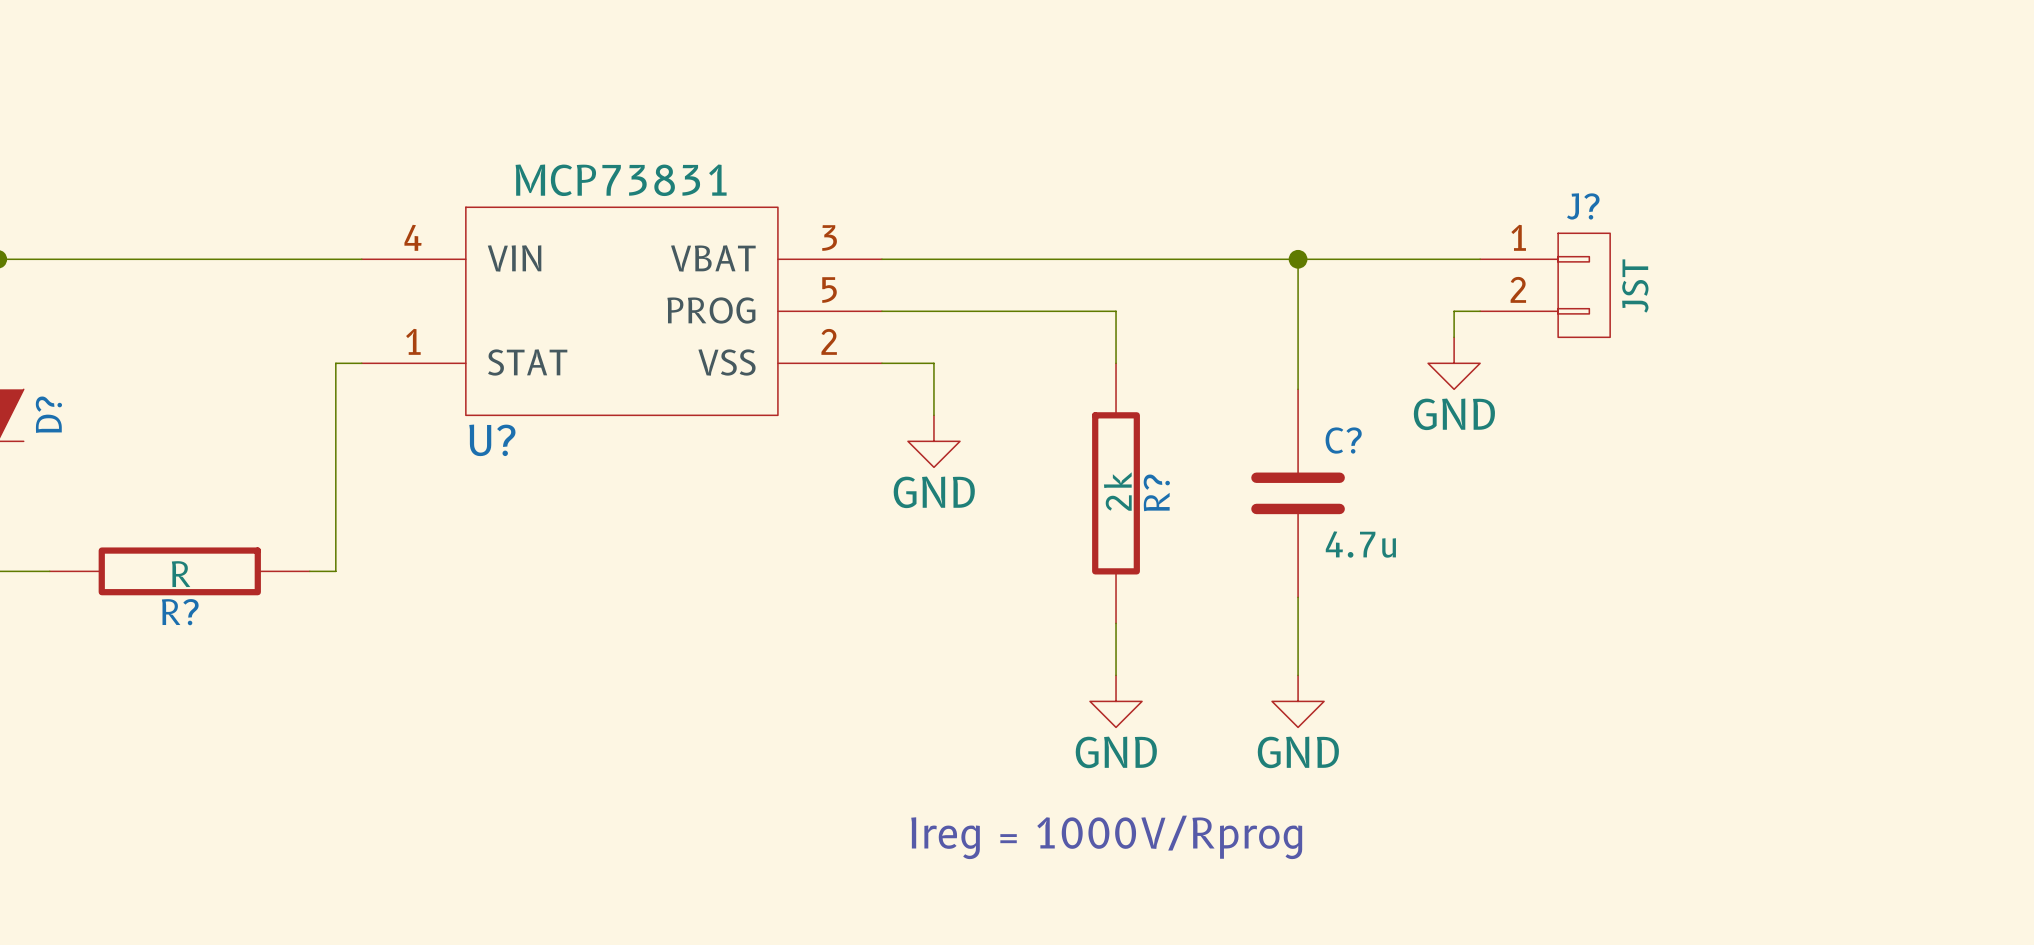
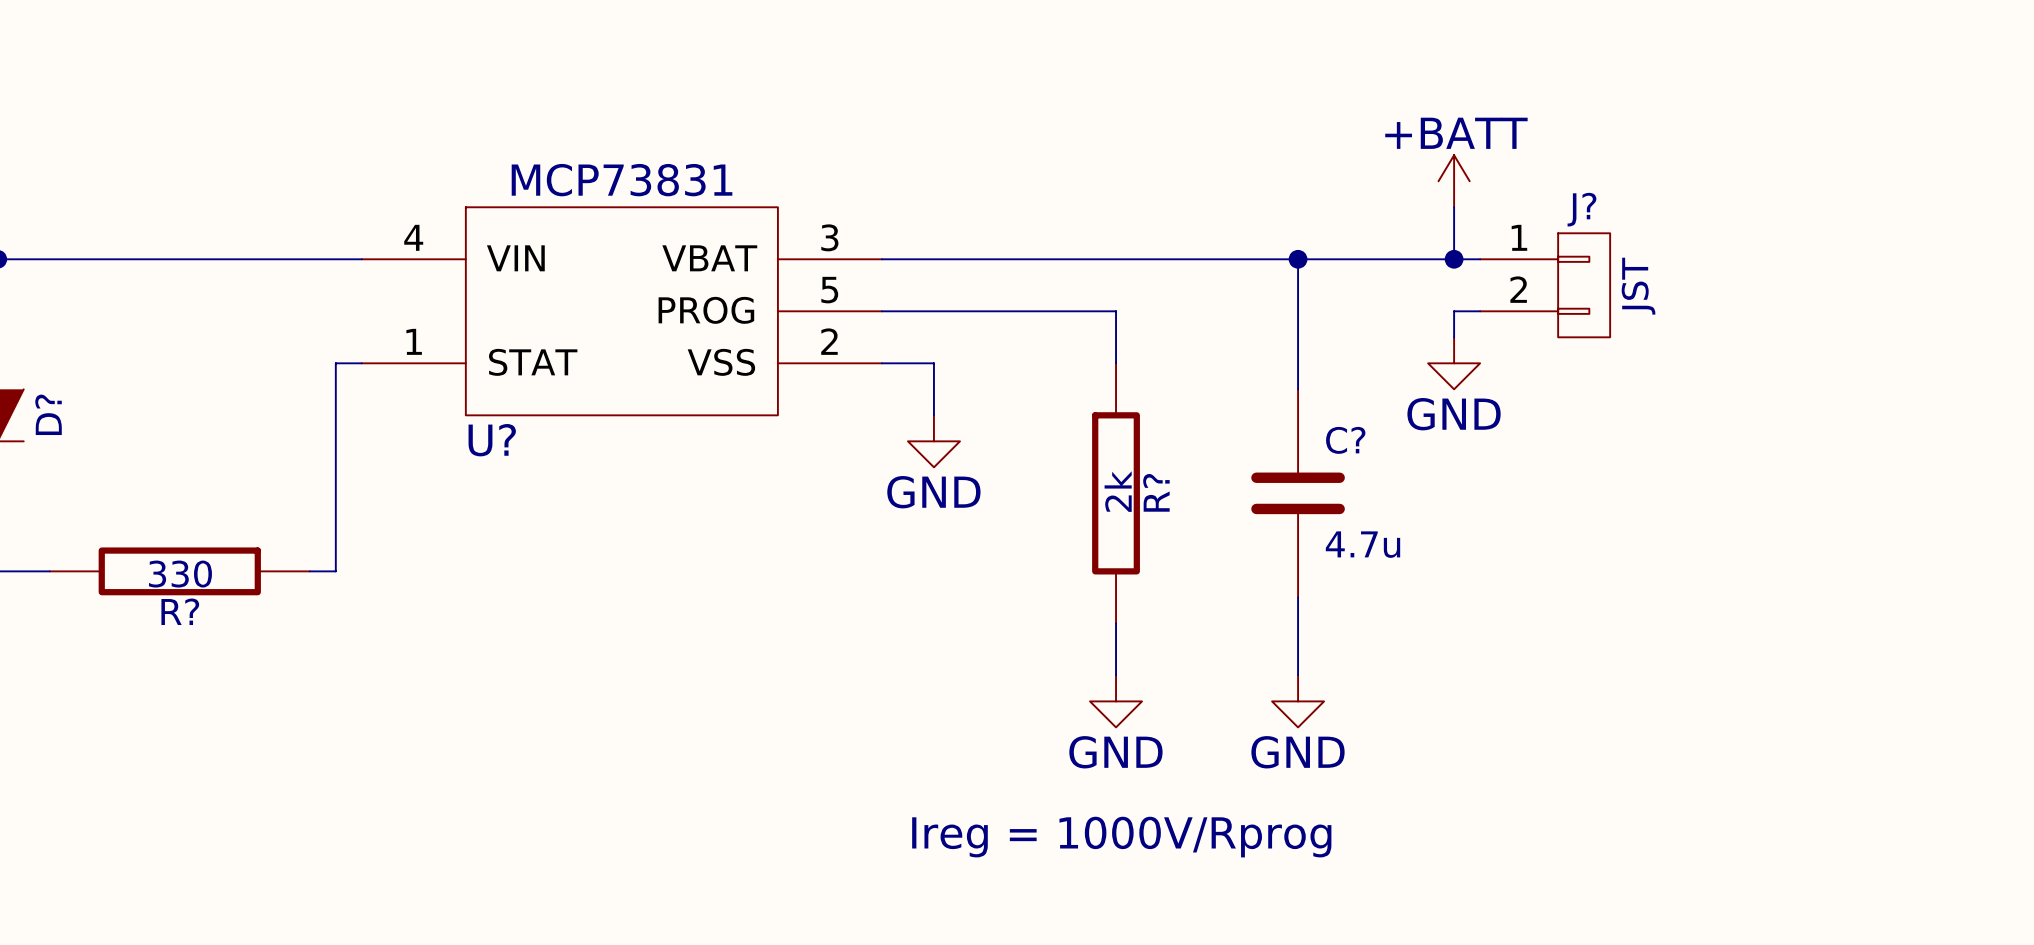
power symbol: none -> +BATT (1454, 181)
wire: none -> (1454, 207) (1454, 259)
junction: none -> (1454, 259)
R? value: R (181, 574) -> 330 (180, 574)

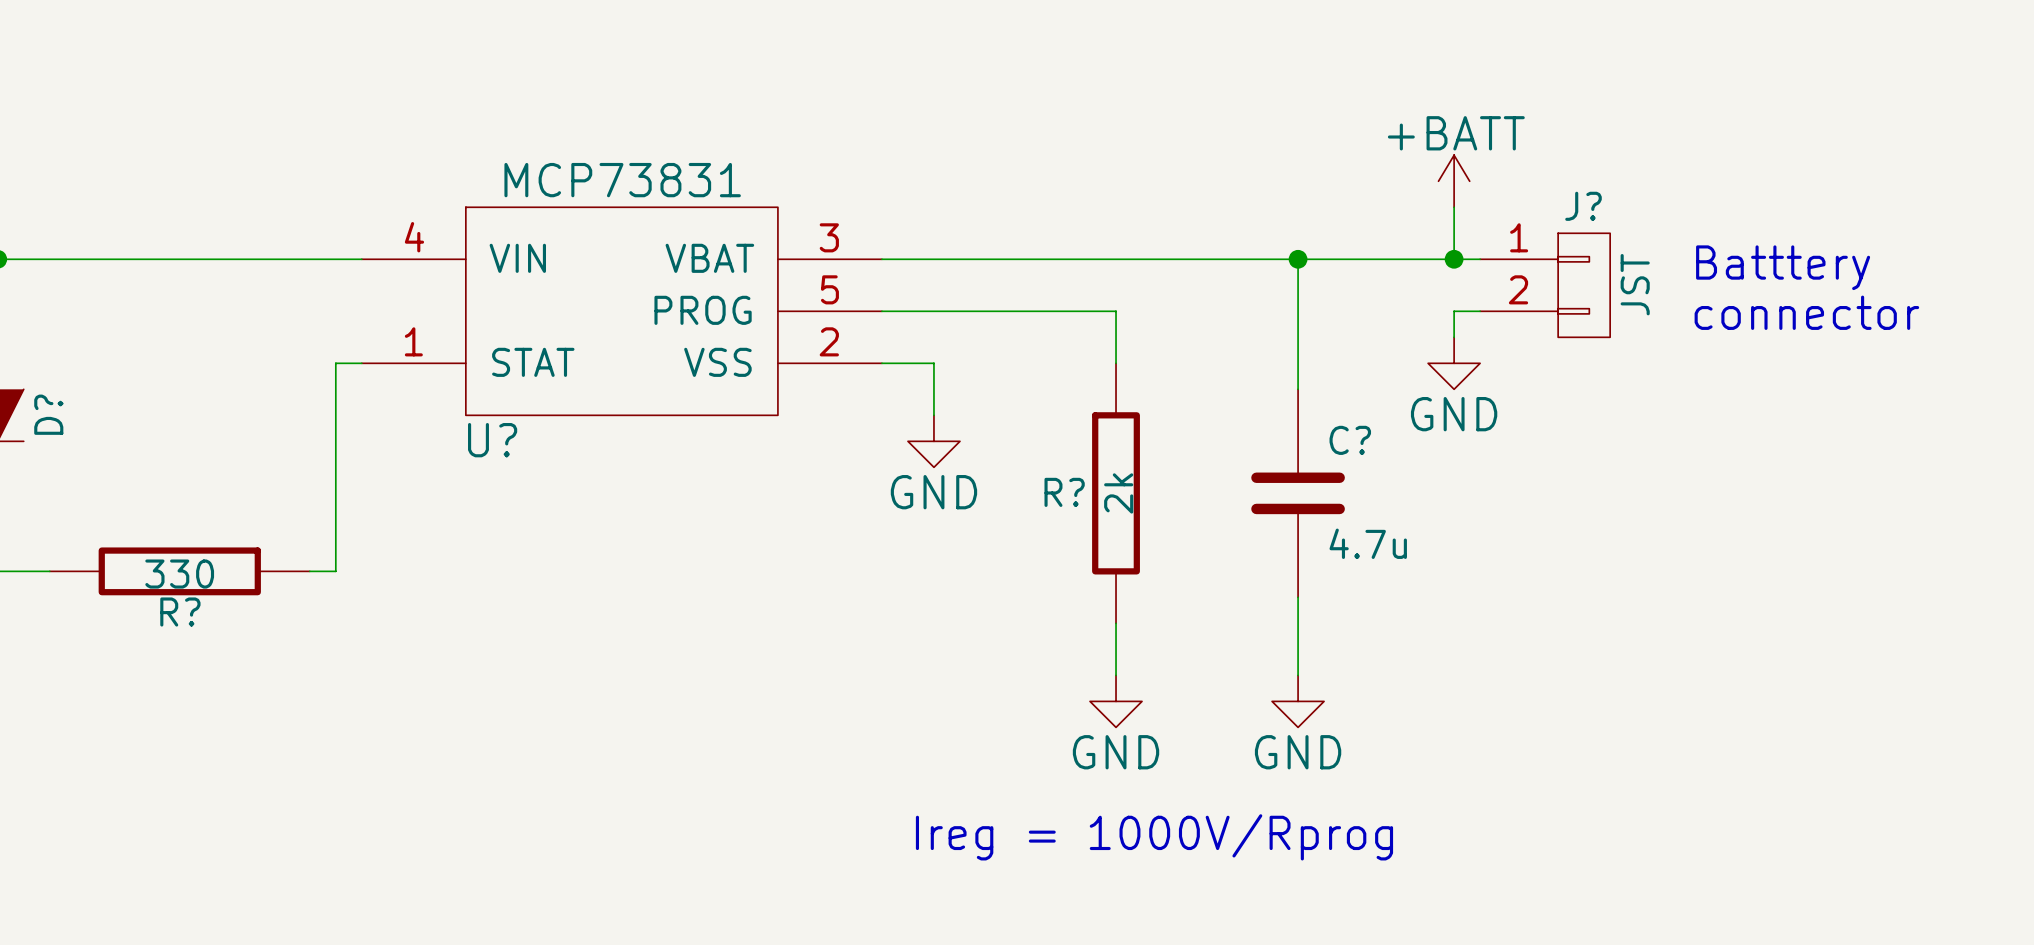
text: none -> Batttery (1783, 267)
text: none -> connector (1806, 312)
R? name rotation: 0° (1156, 492) -> 90° clockwise (1064, 492)
R? name position: R? (1156, 492) -> R? (1064, 492)

